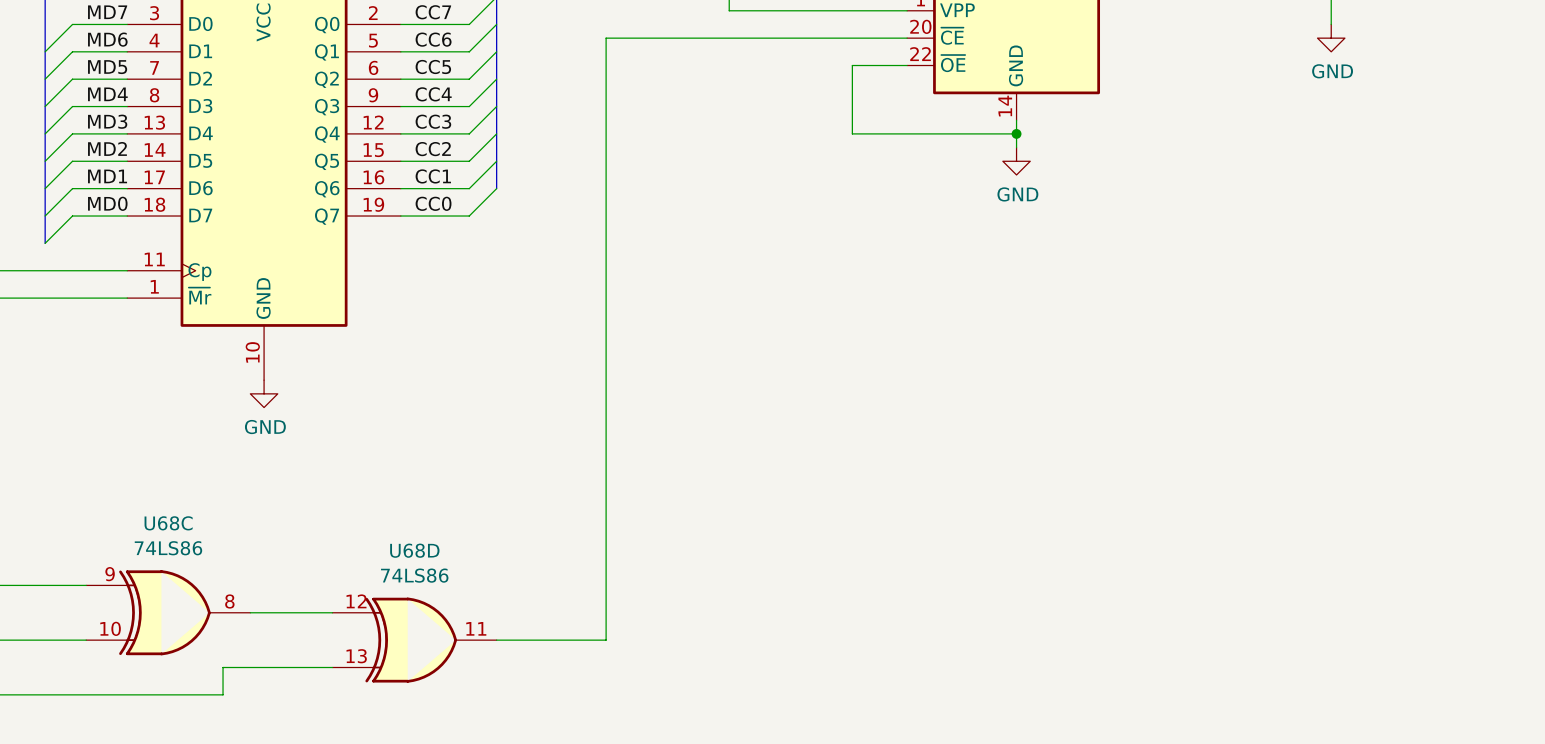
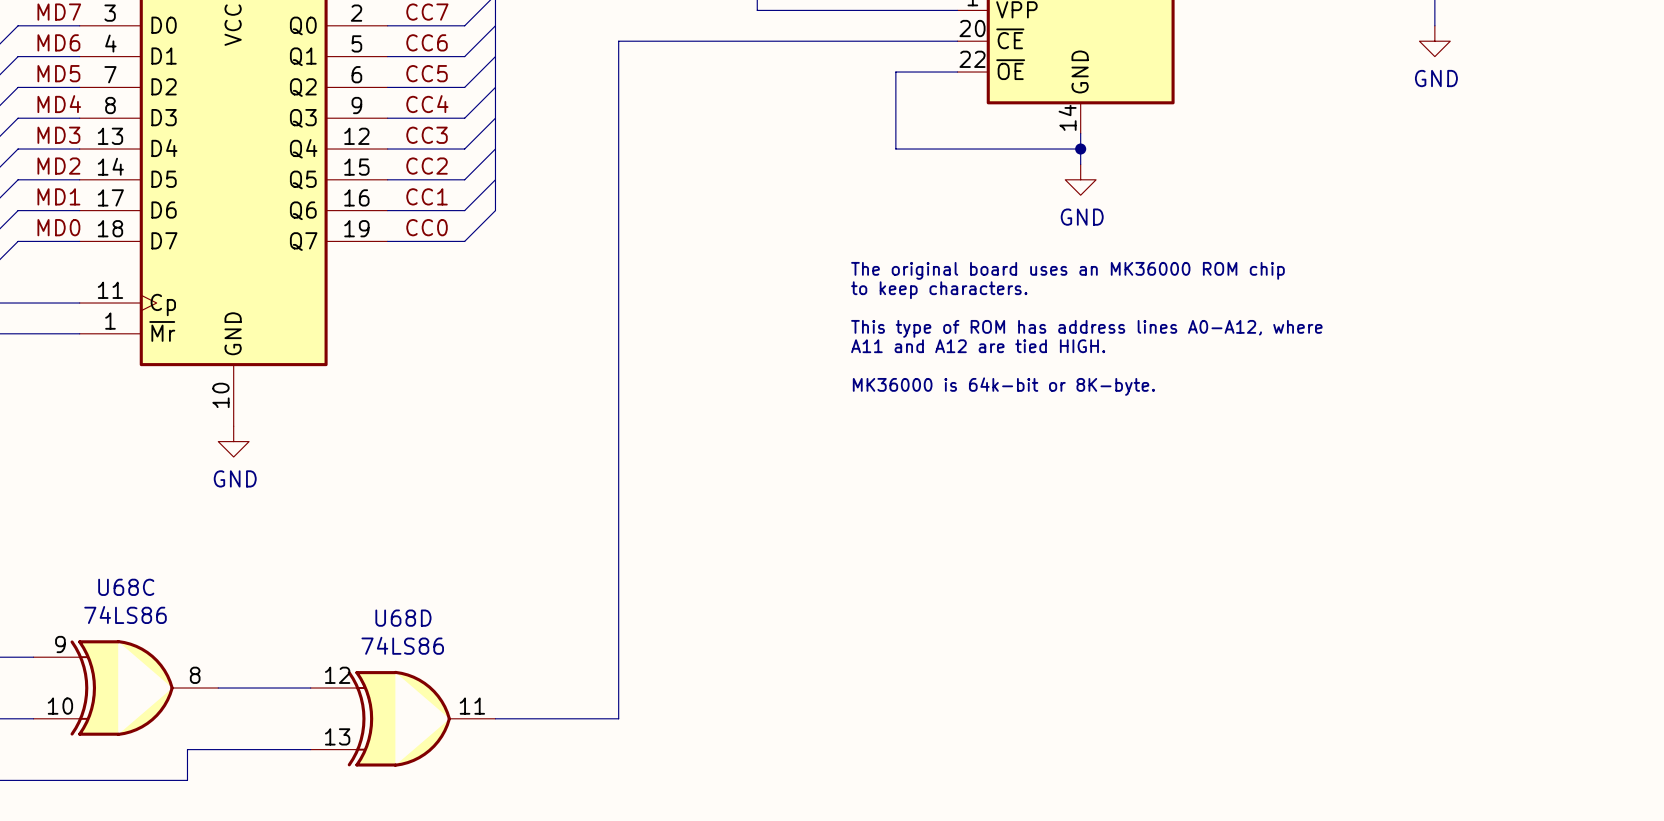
text: none -> The original board uses an MK36000 ROM chip (1067, 270)
text: none -> to keep characters. (939, 290)
text: none -> This type of ROM has address lines A0-A12, where (1086, 328)
text: none -> A11 and A12 are tied HIGH. (978, 346)
text: none -> MK36000 is 64k-bit or 8K-byte. (1003, 386)

